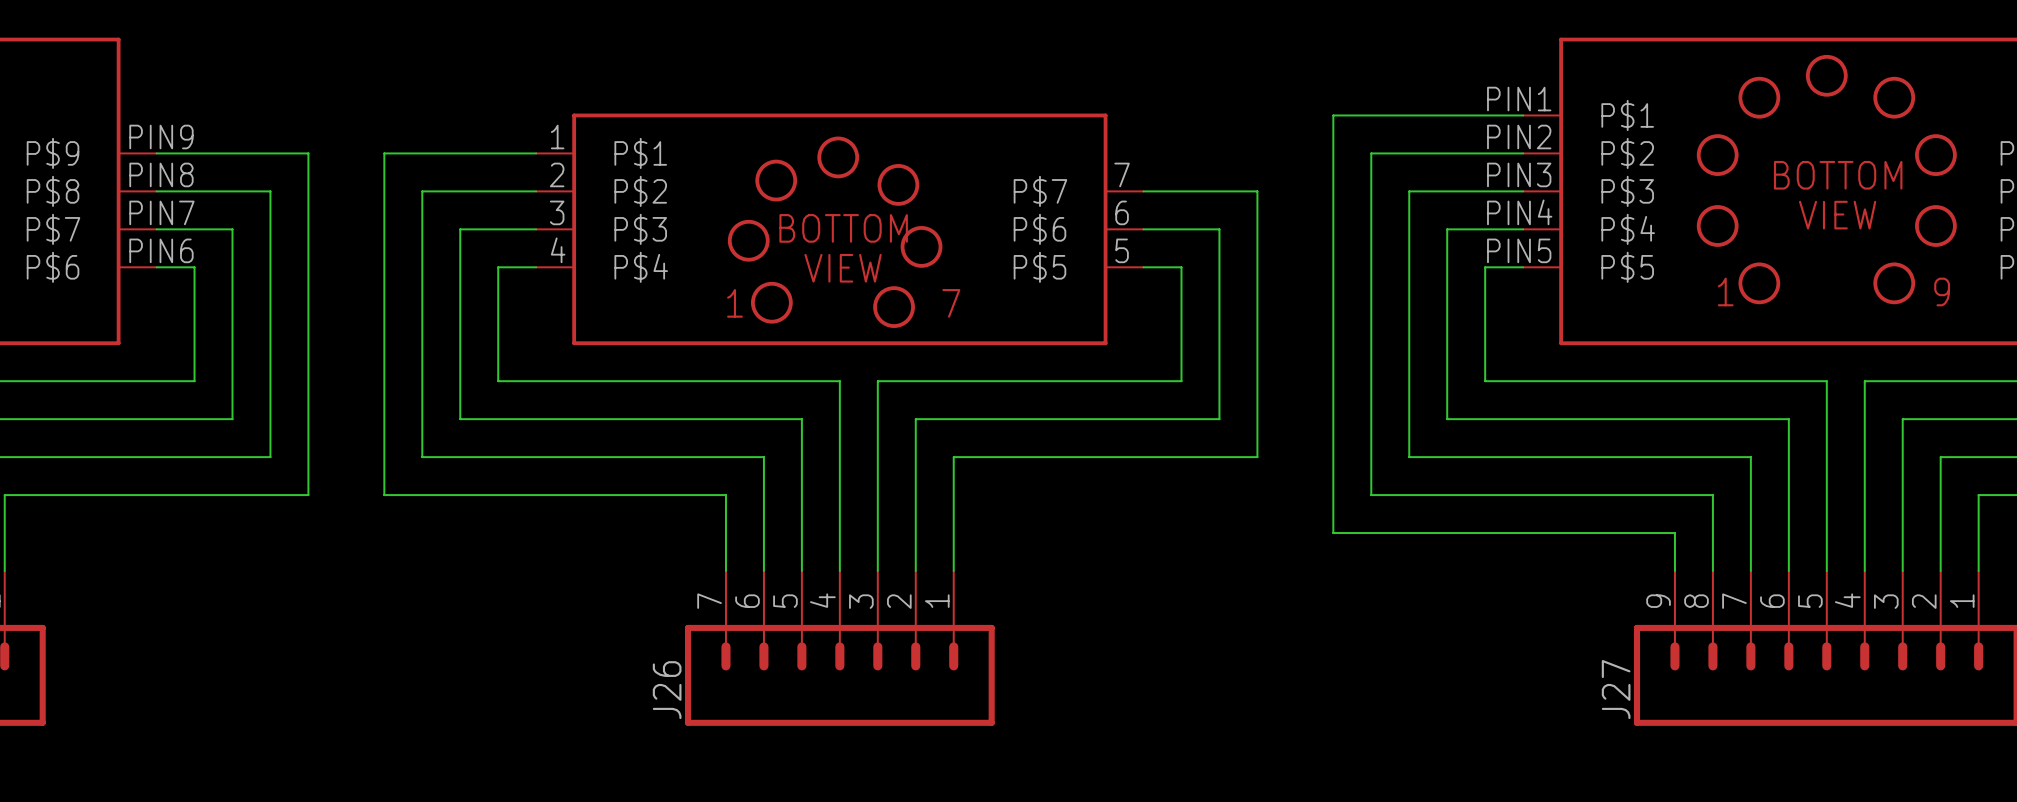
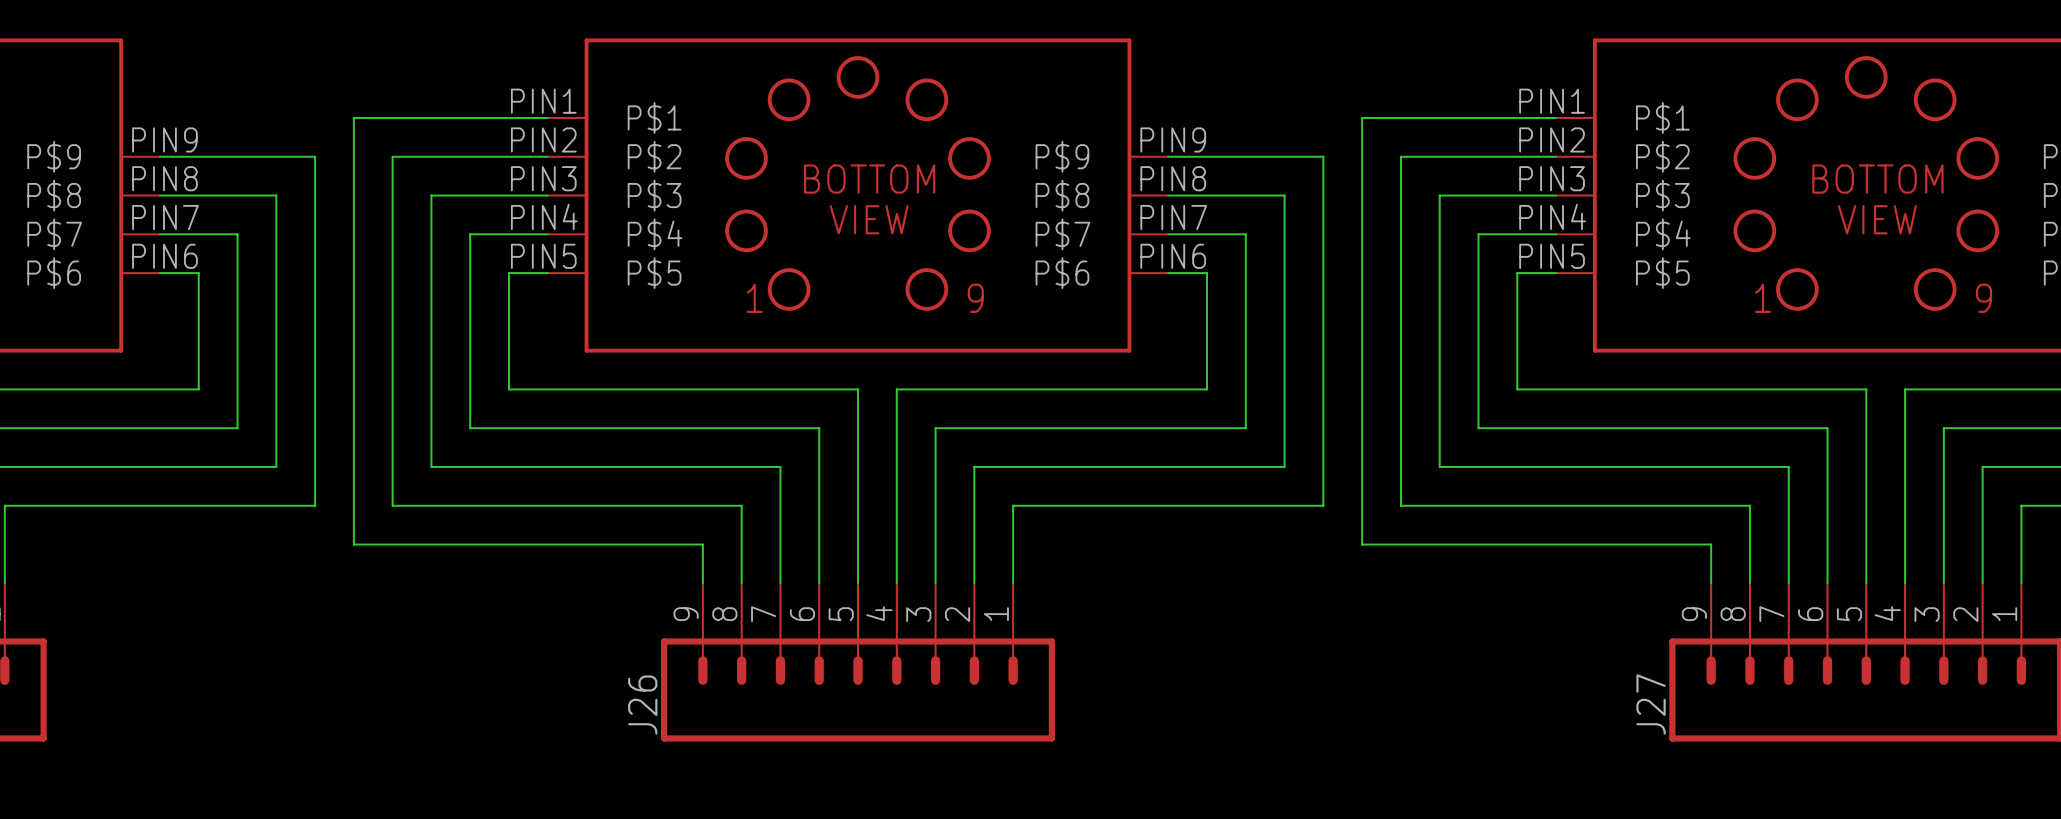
wire: none -> (547, 117) (353, 117) (353, 544) (702, 544) (702, 583)
wire: none -> (1168, 156) (1323, 156) (1323, 505) (1013, 505) (1013, 583)
part: none -> (858, 195)
part: (839, 229) -> none
J26 symbol: [684, 570, 995, 726] -> [661, 583, 1056, 742]
J26 name position: J26 (667, 690) -> J26 (642, 705)

